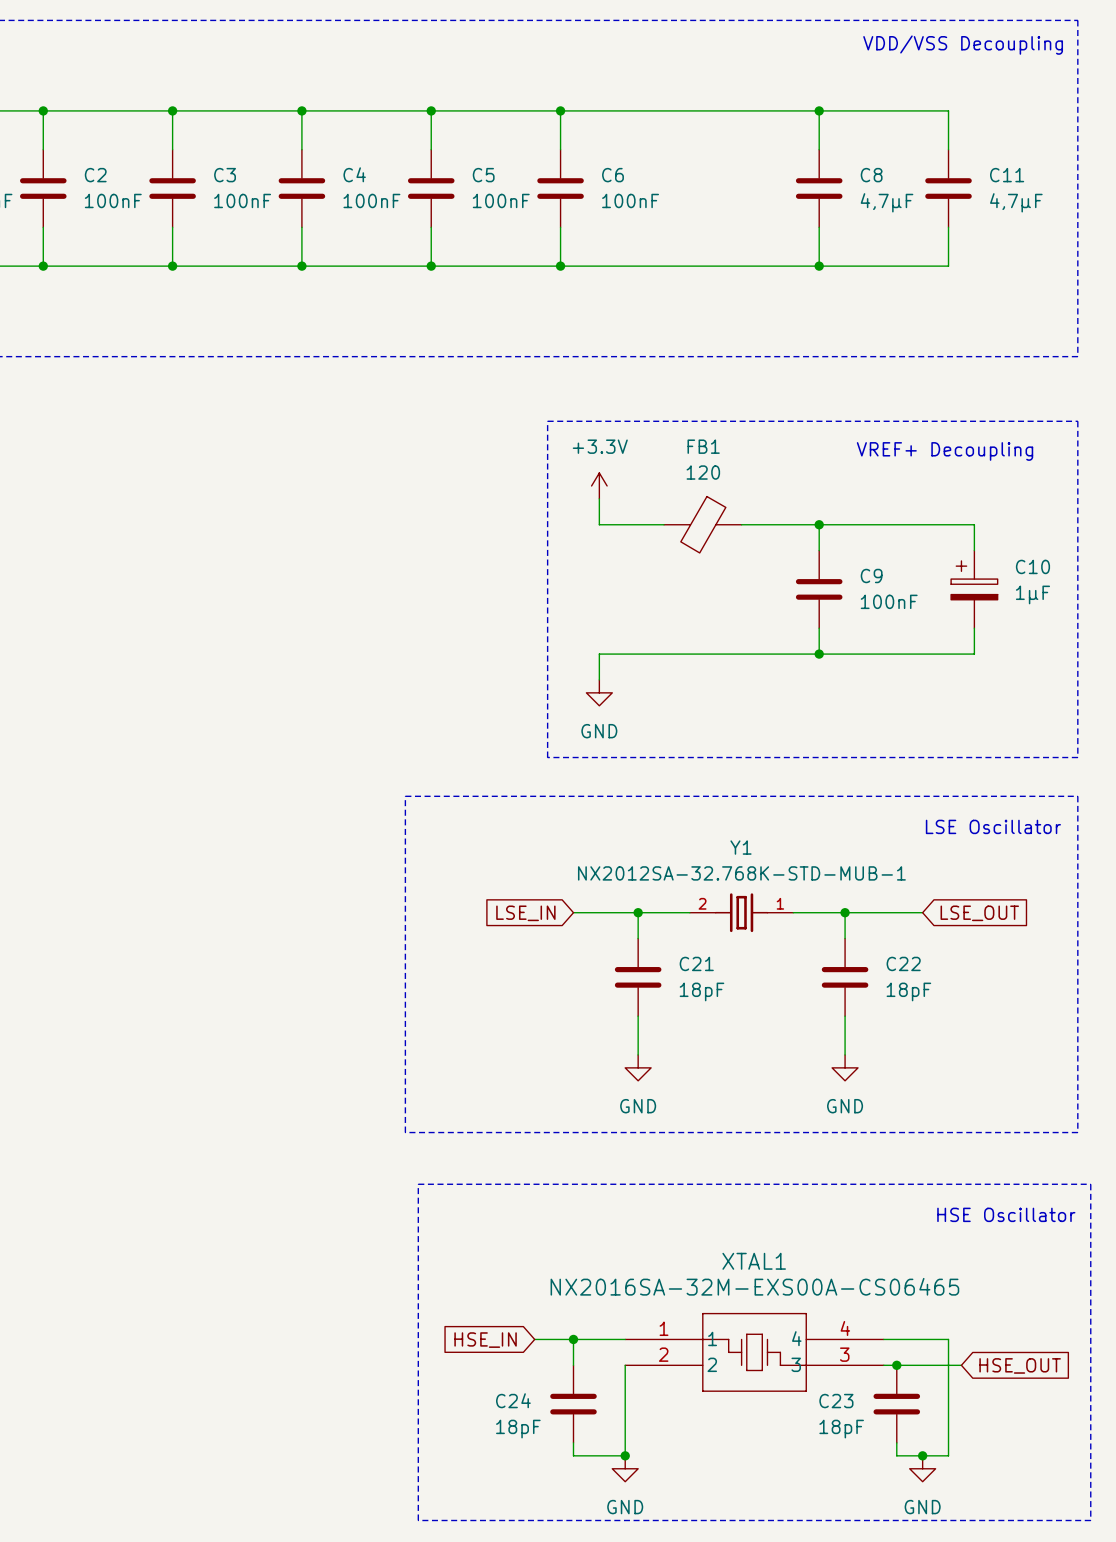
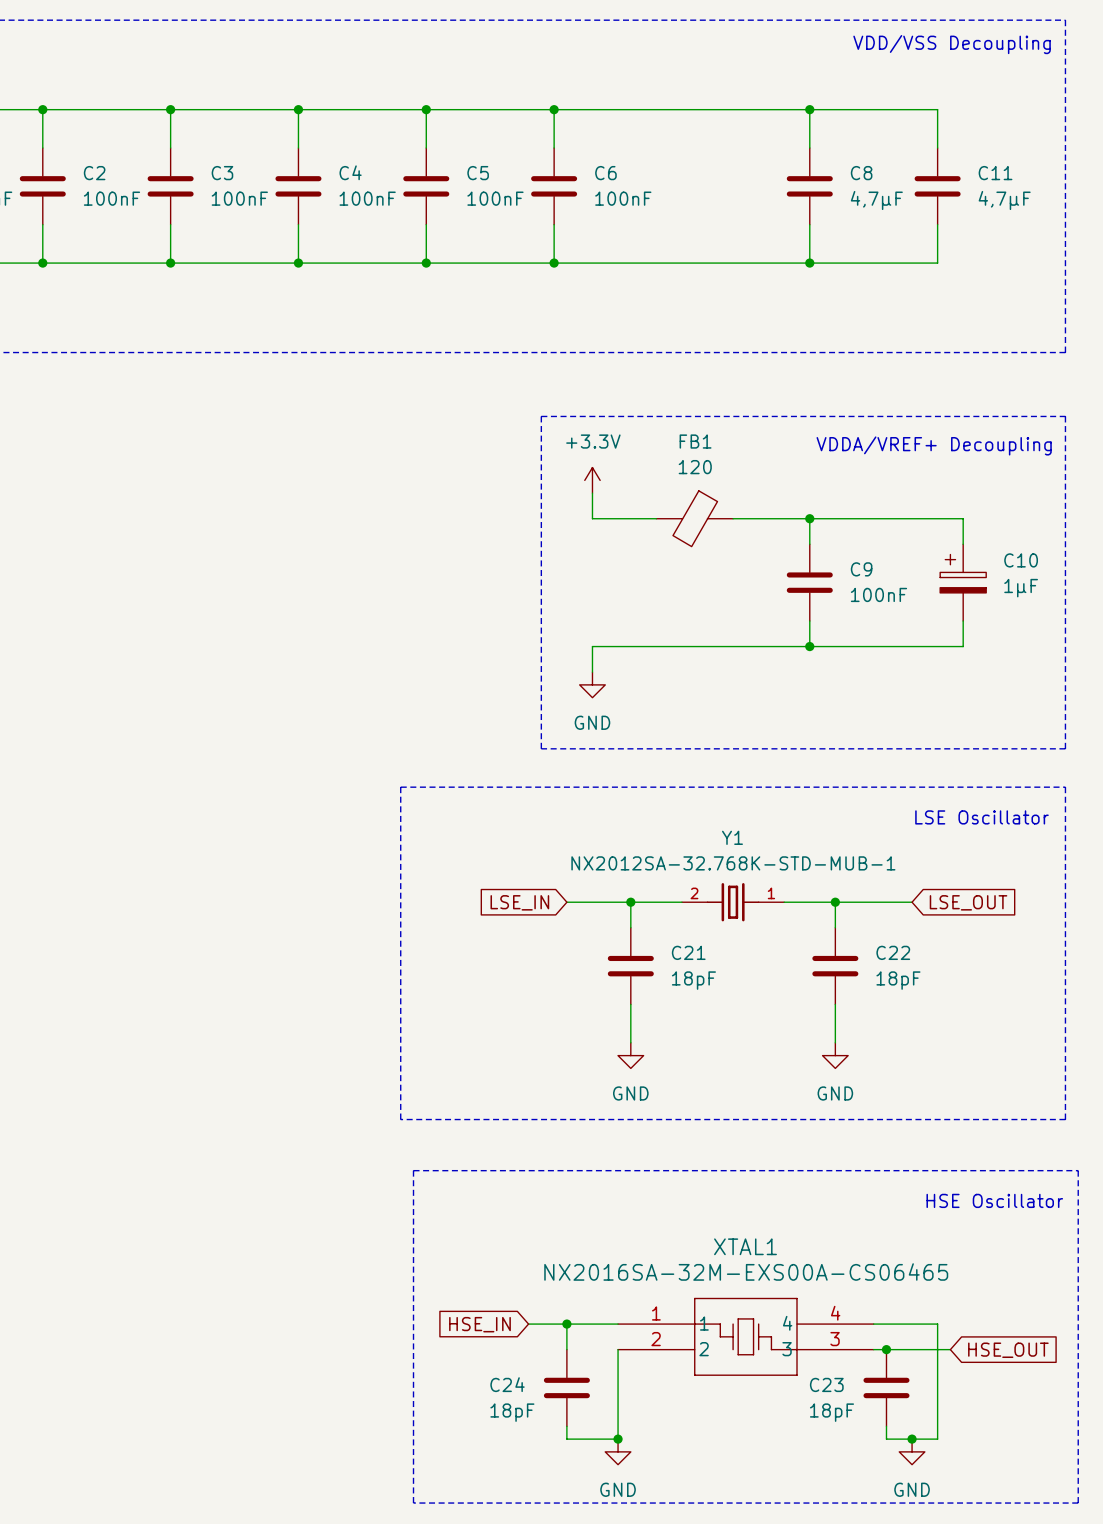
text: VREF+ Decoupling (945, 451) -> VDDA/VREF+ Decoupling (934, 445)

